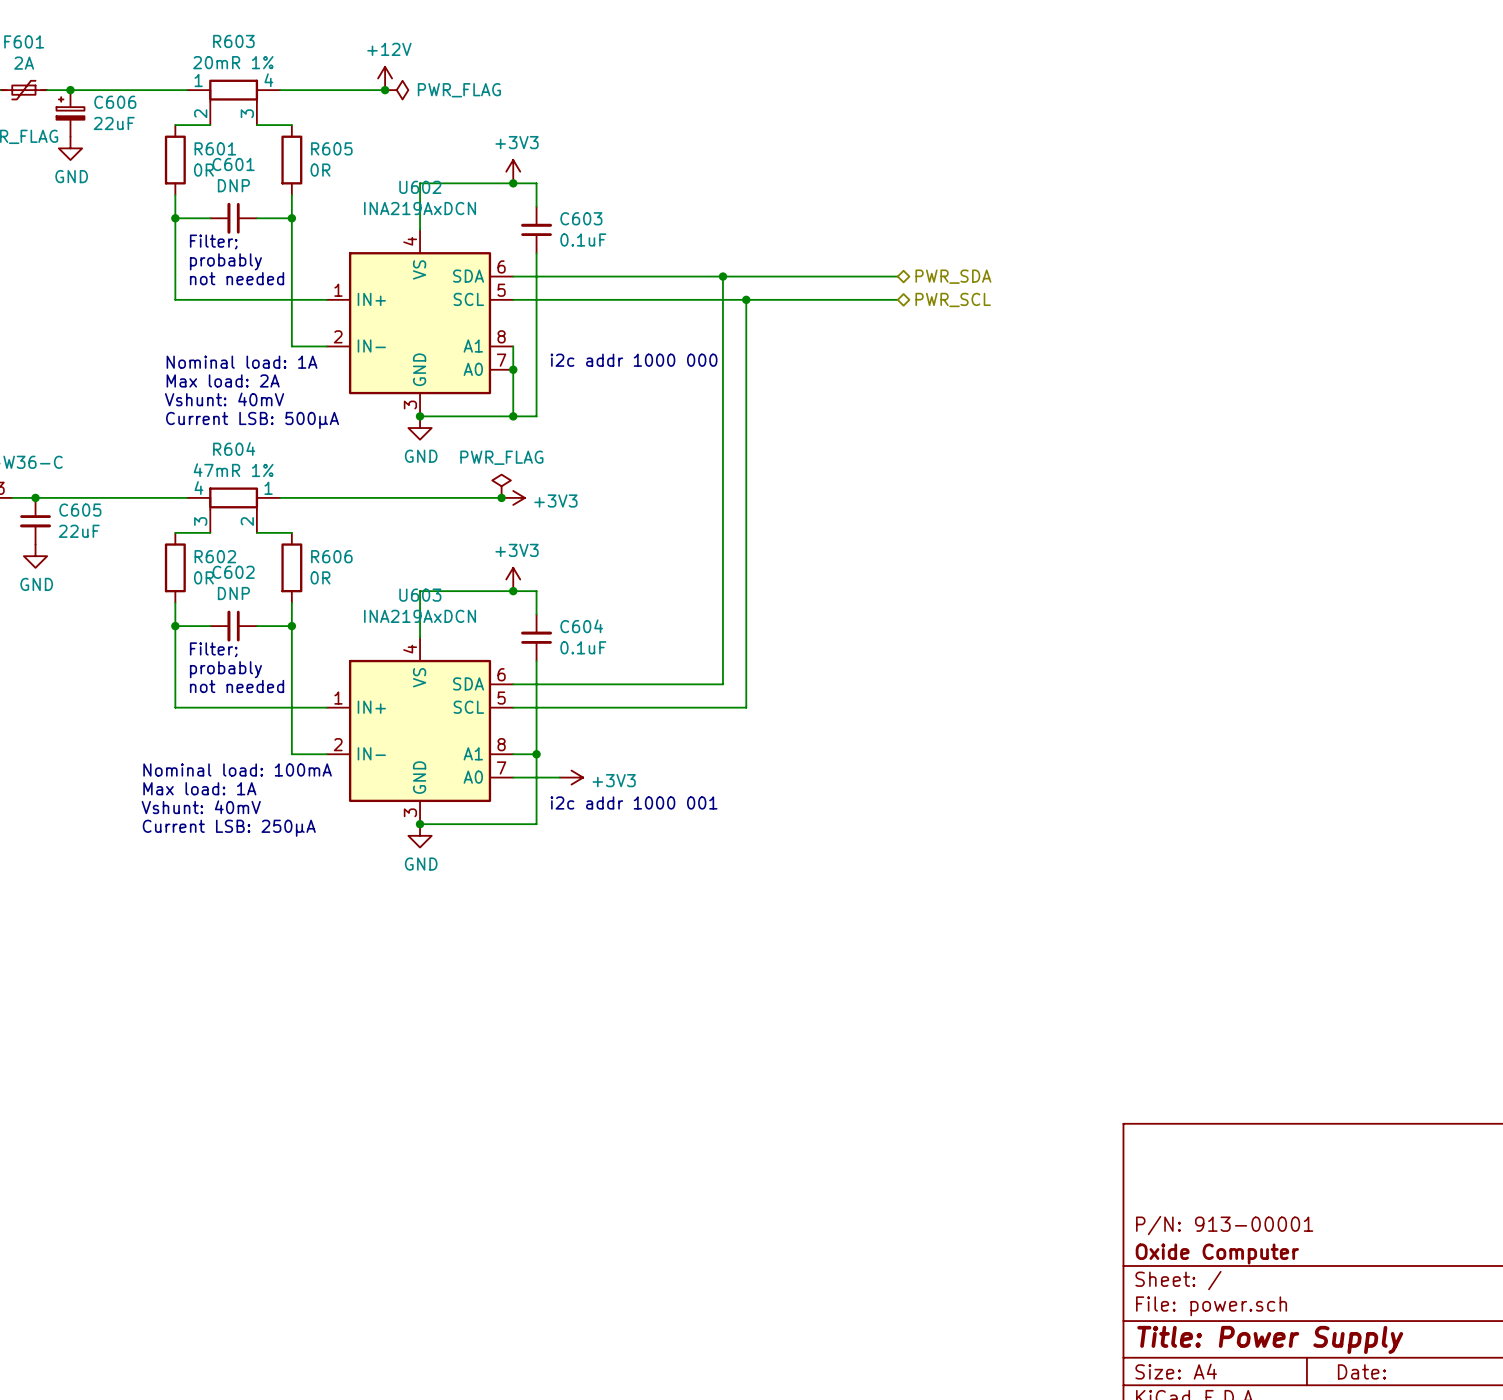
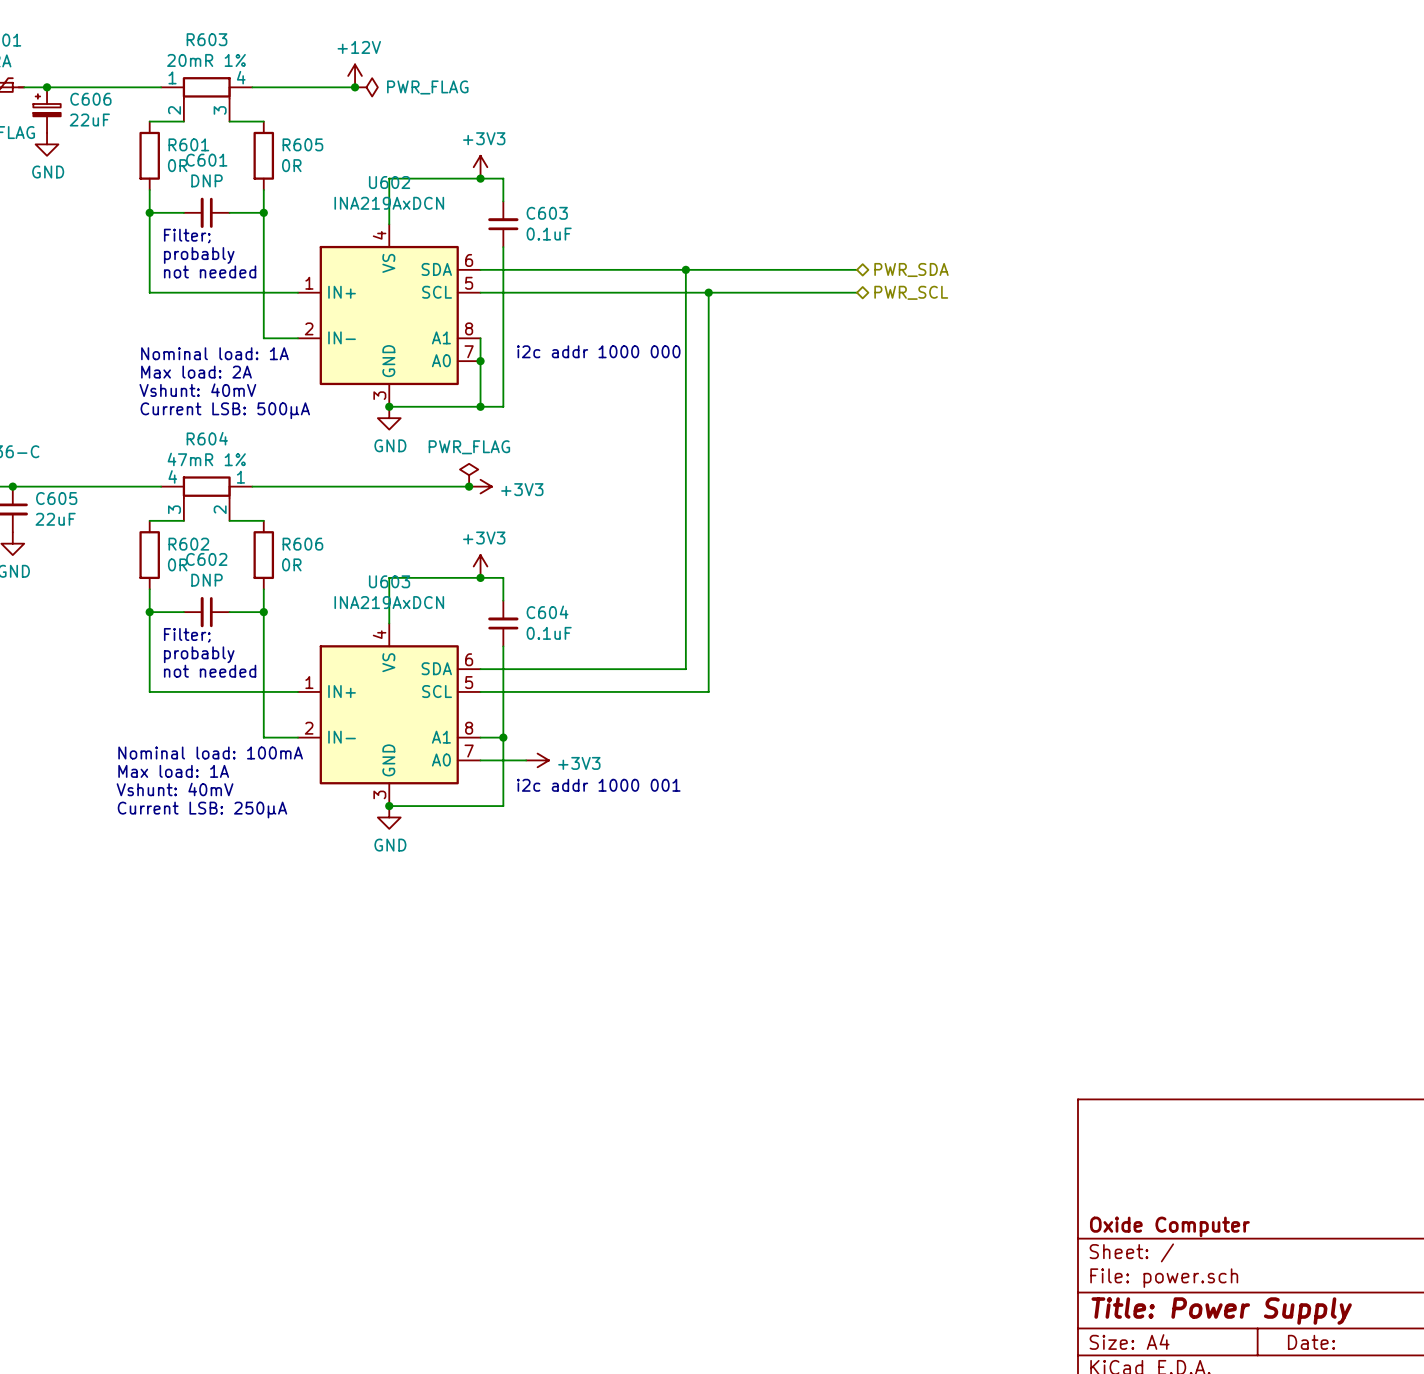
title block: P/N: 913-00001 (1224, 1225) -> none

